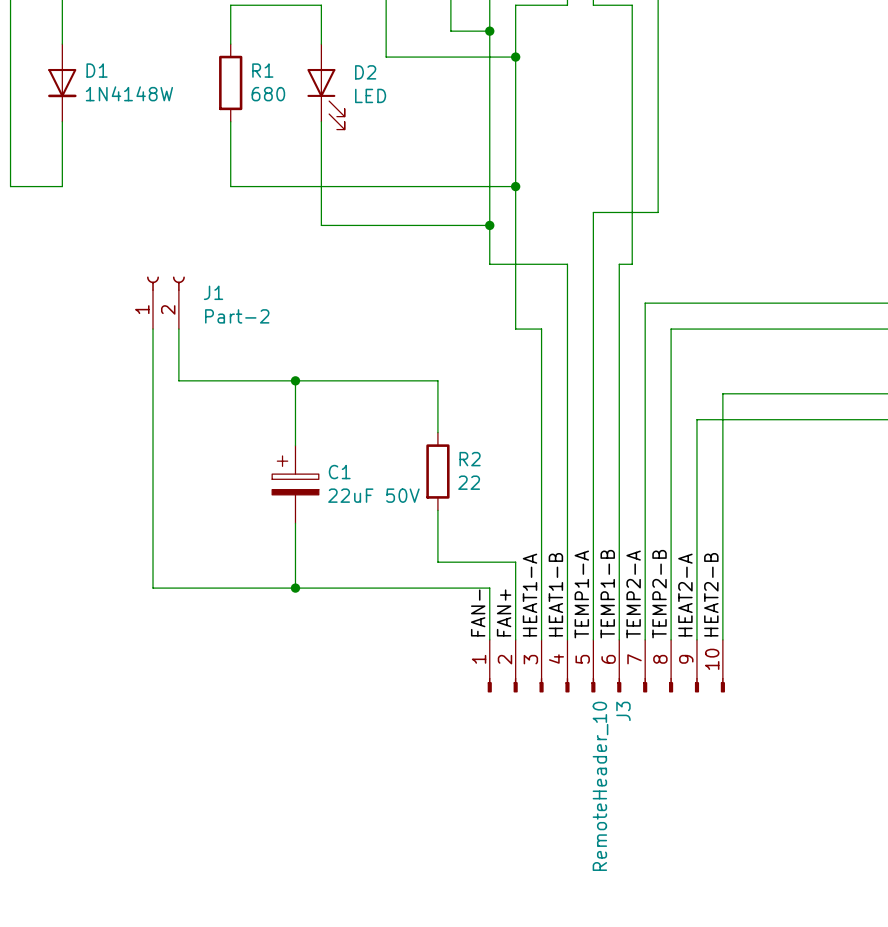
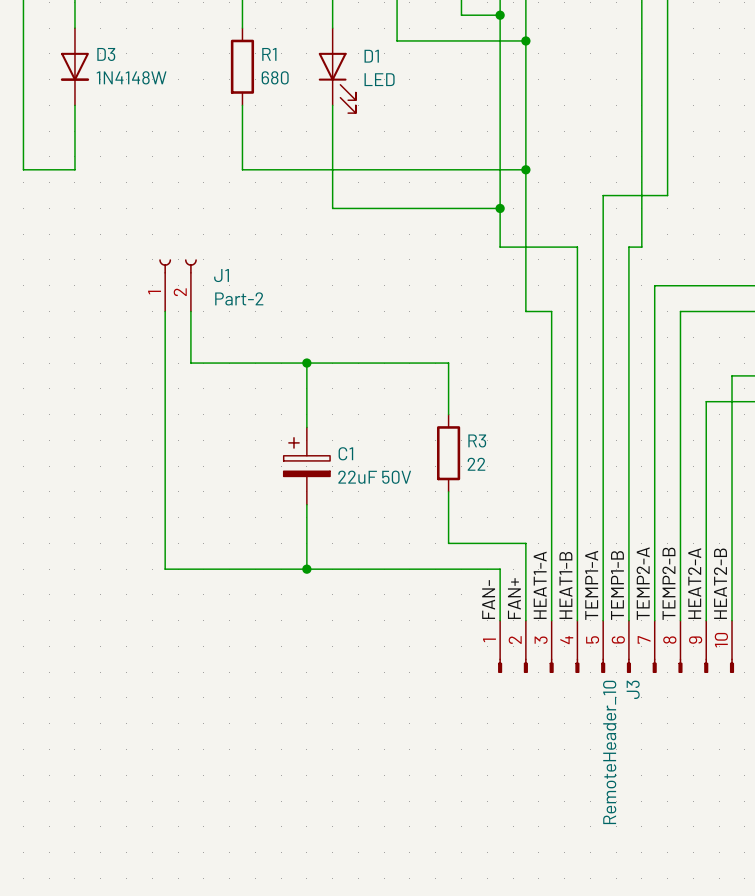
D1 name: D1 (97, 70) -> D3 (106, 54)
D2 name: D2 (365, 72) -> D1 (371, 56)
R2 name: R2 (470, 459) -> R3 (477, 440)

